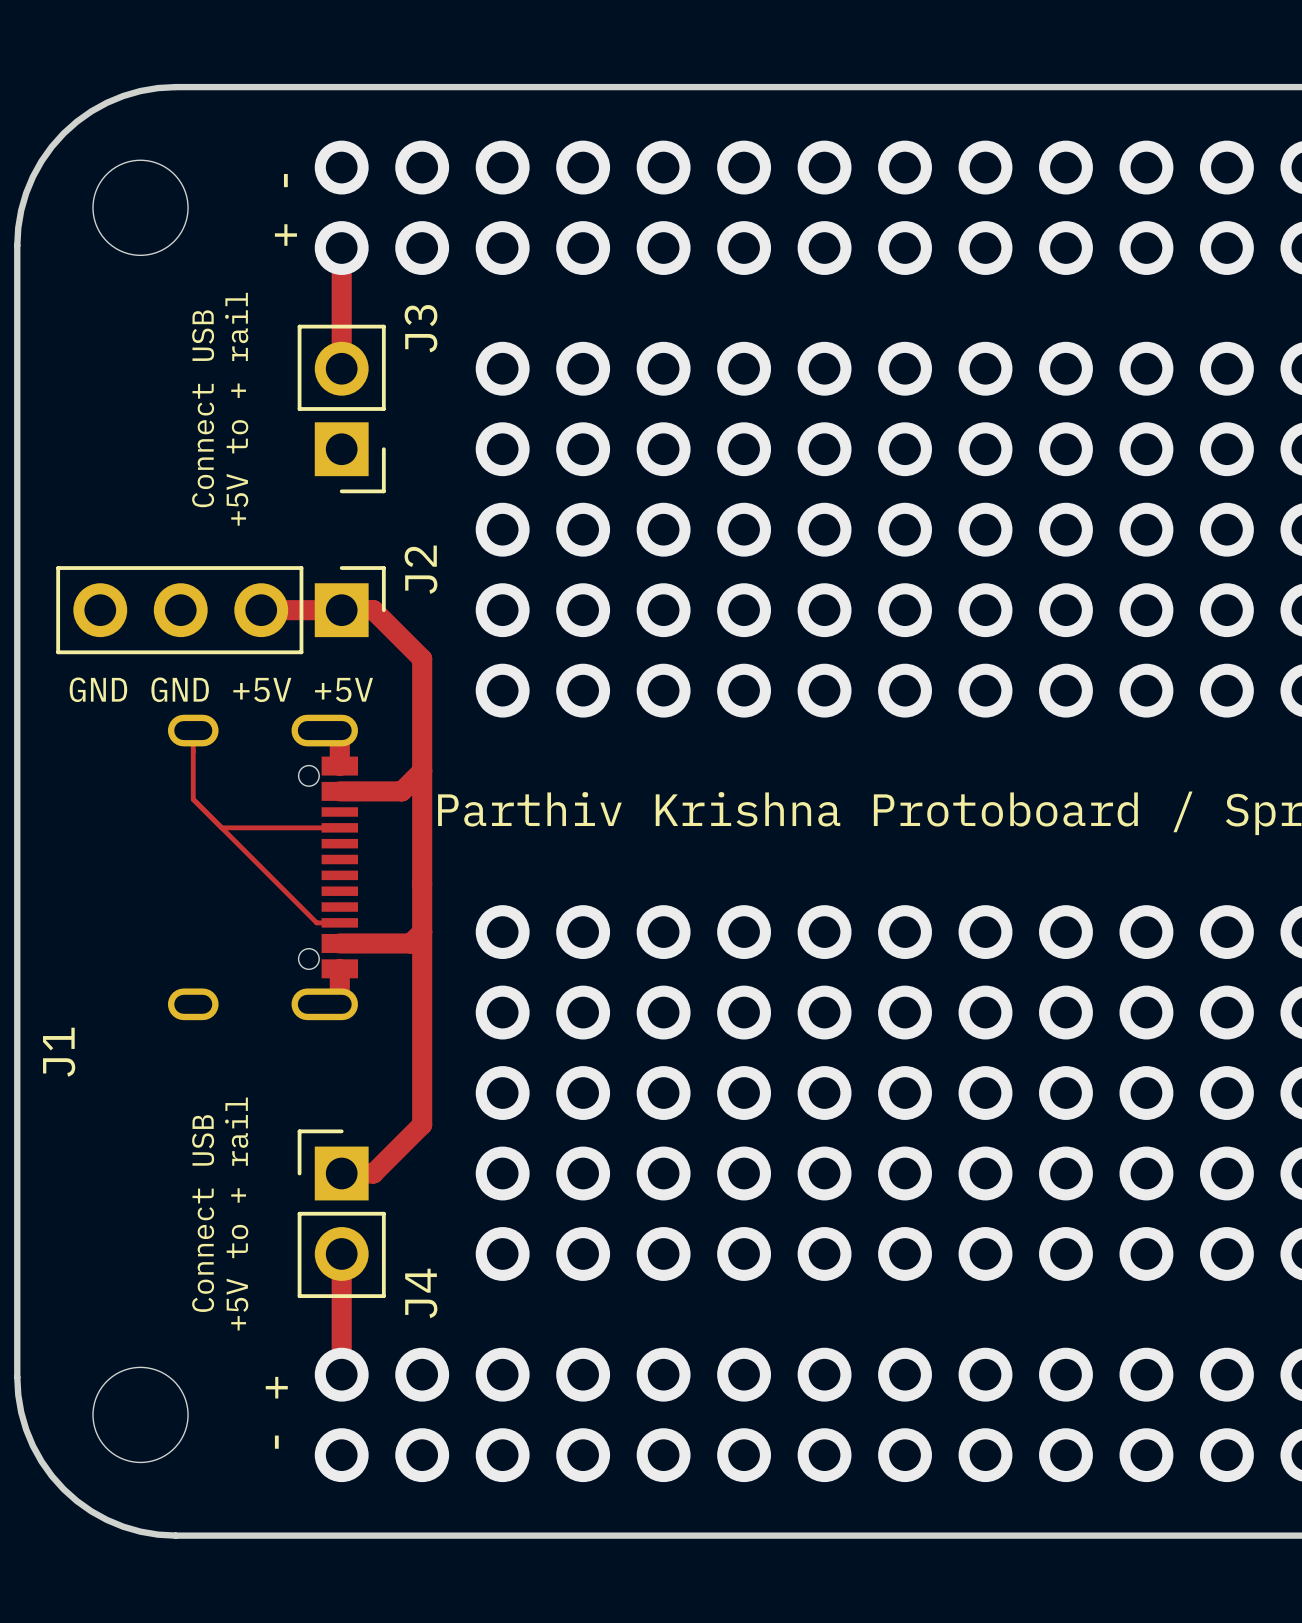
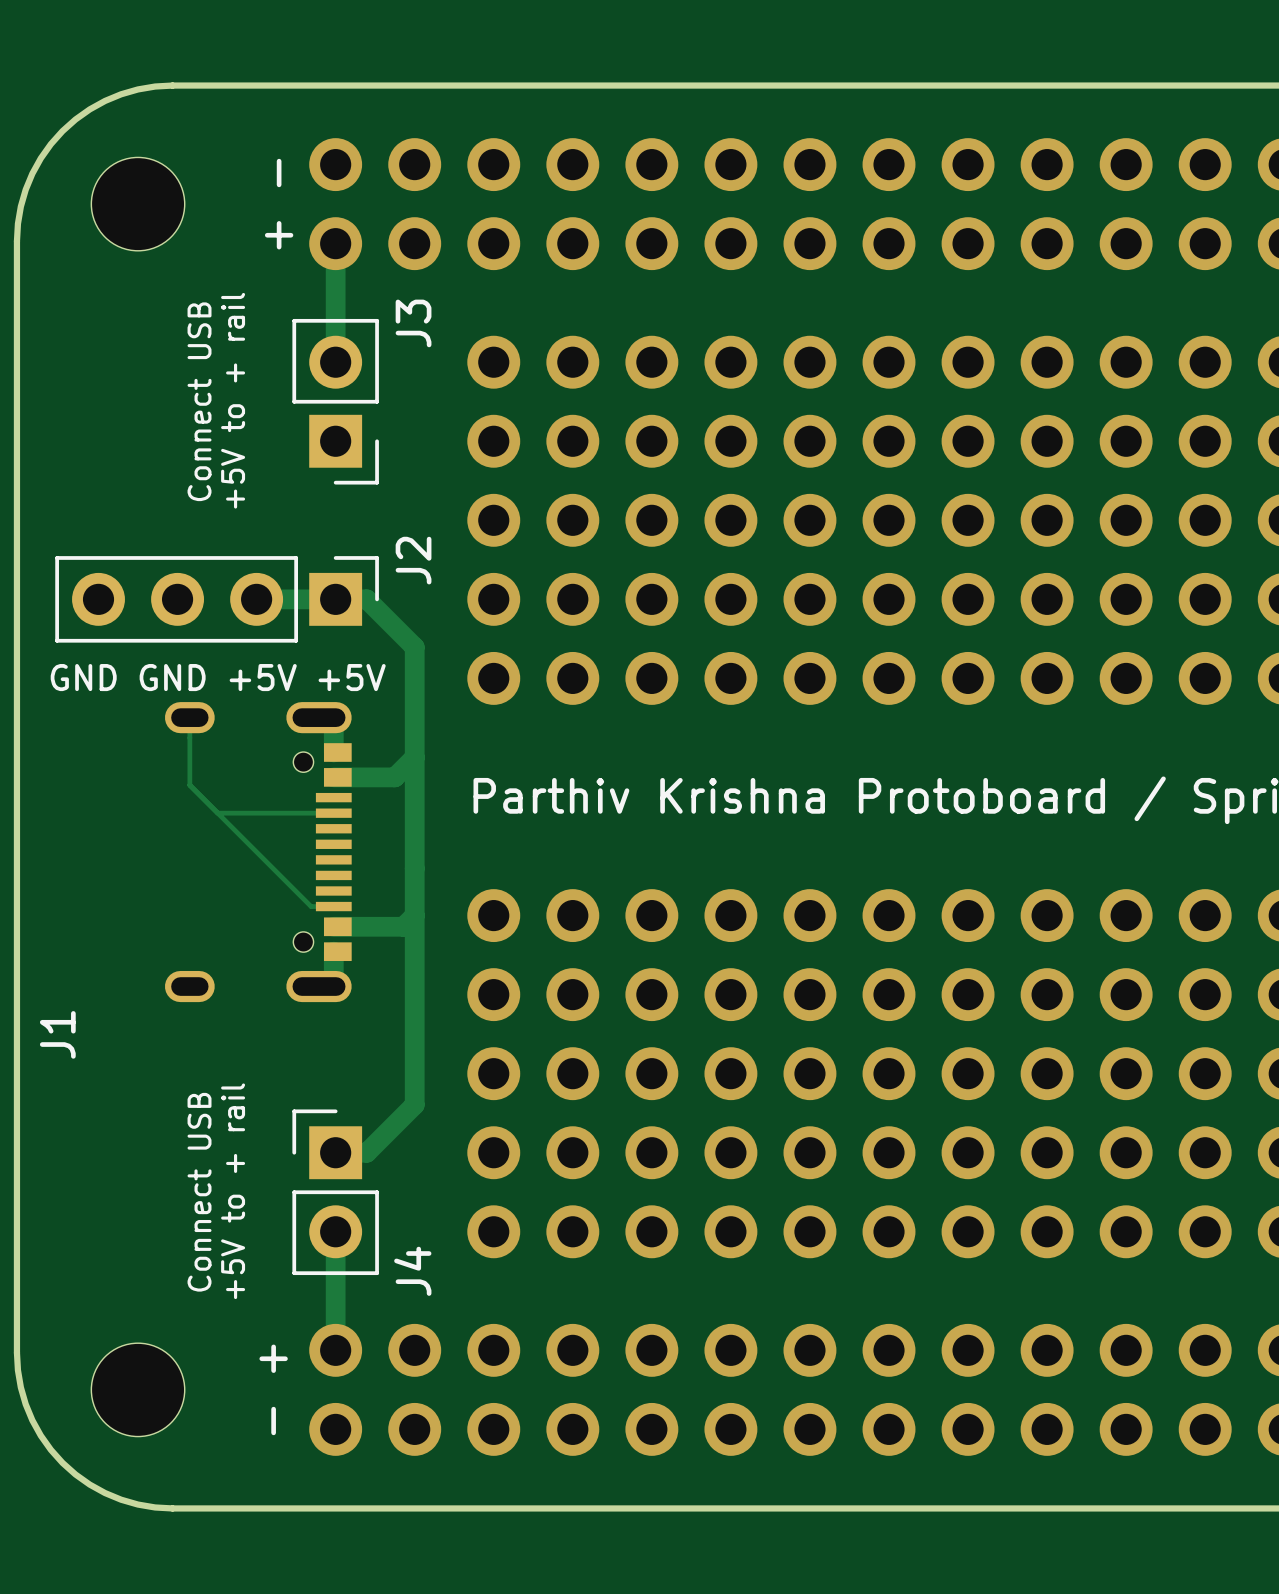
J1 footprint: [167, 714, 359, 1021] -> [164, 702, 352, 1003]

